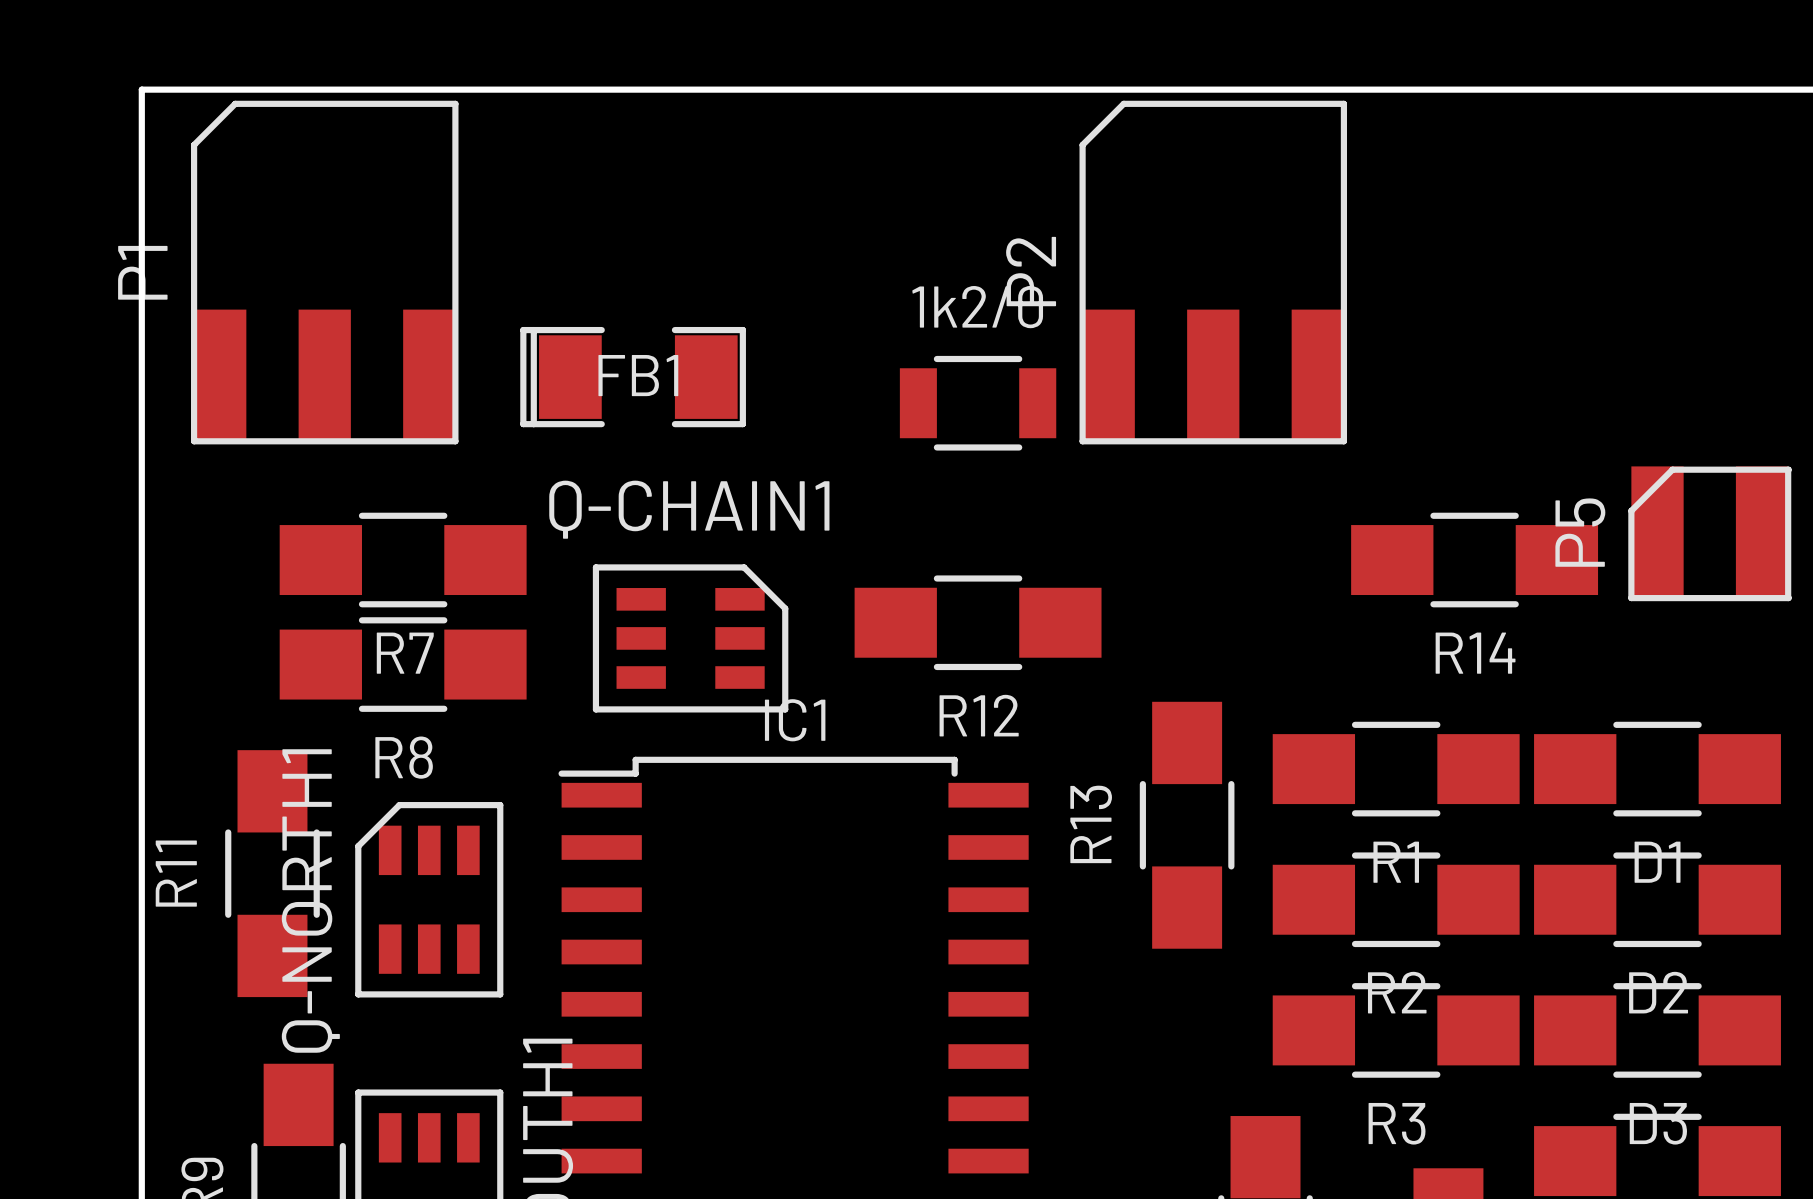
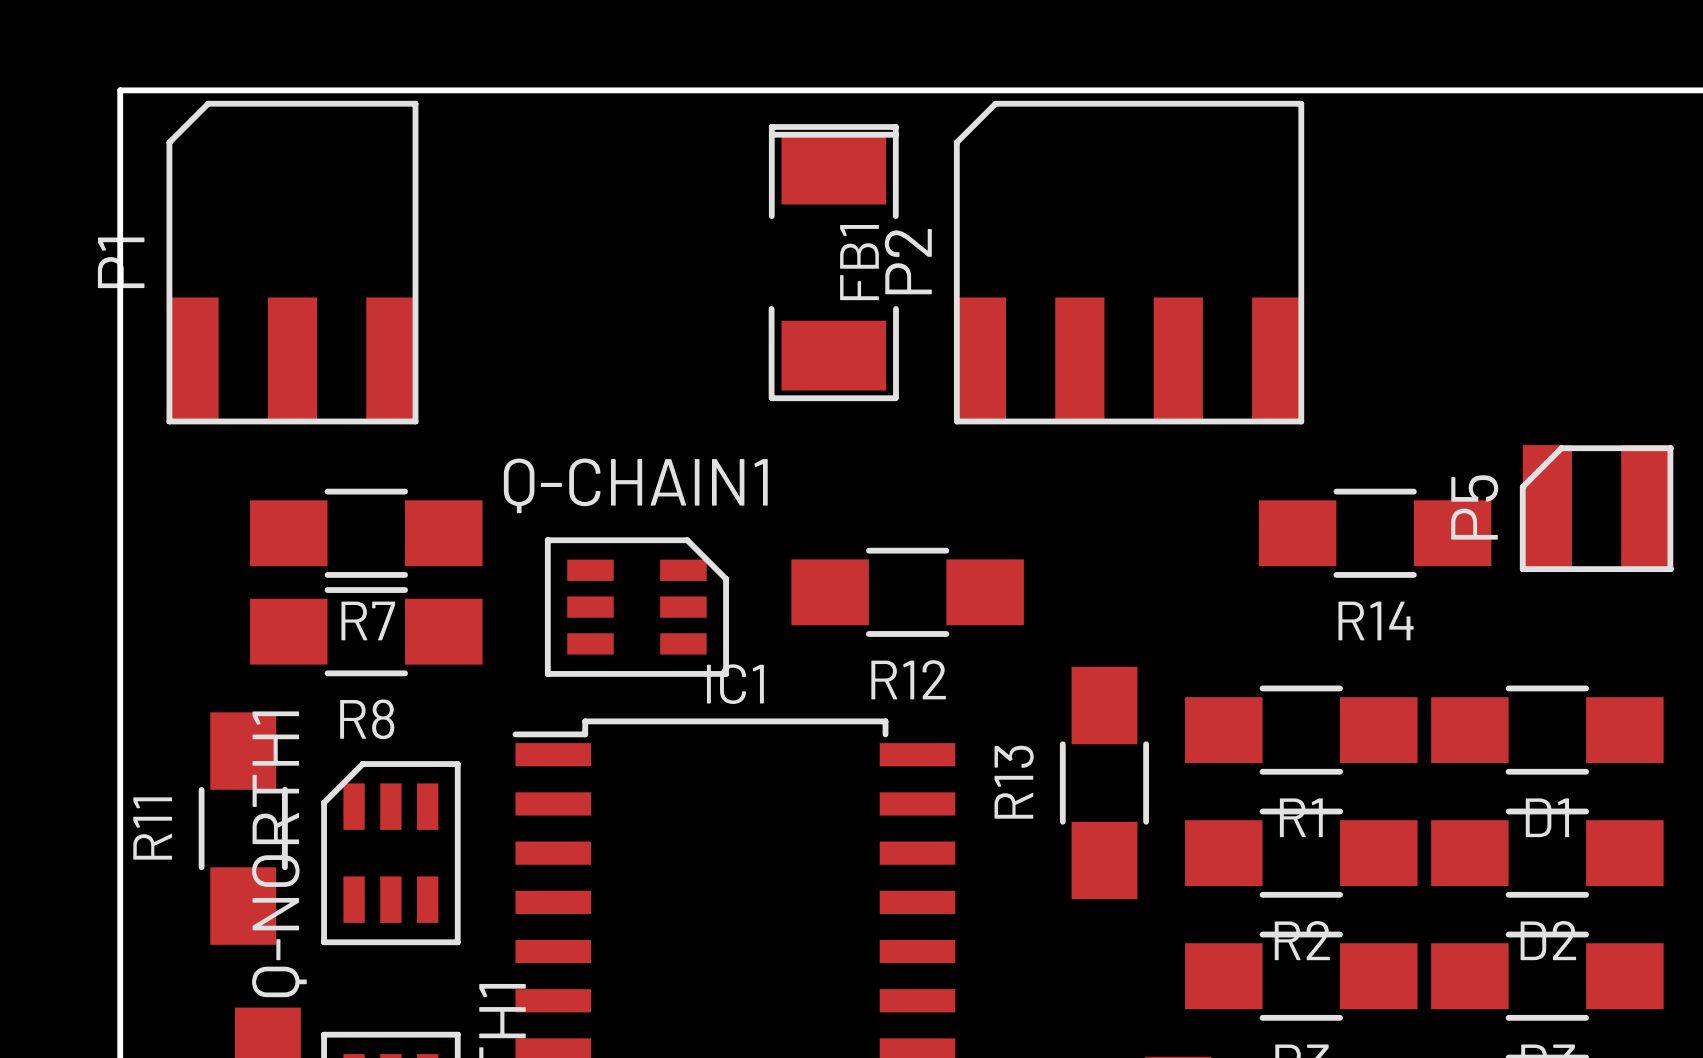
P2 footprint: [1079, 100, 1348, 445] -> [953, 100, 1305, 425]
FB1 footprint: [520, 326, 746, 428] -> [768, 124, 899, 402]
1k2/0: (978, 403) -> none

